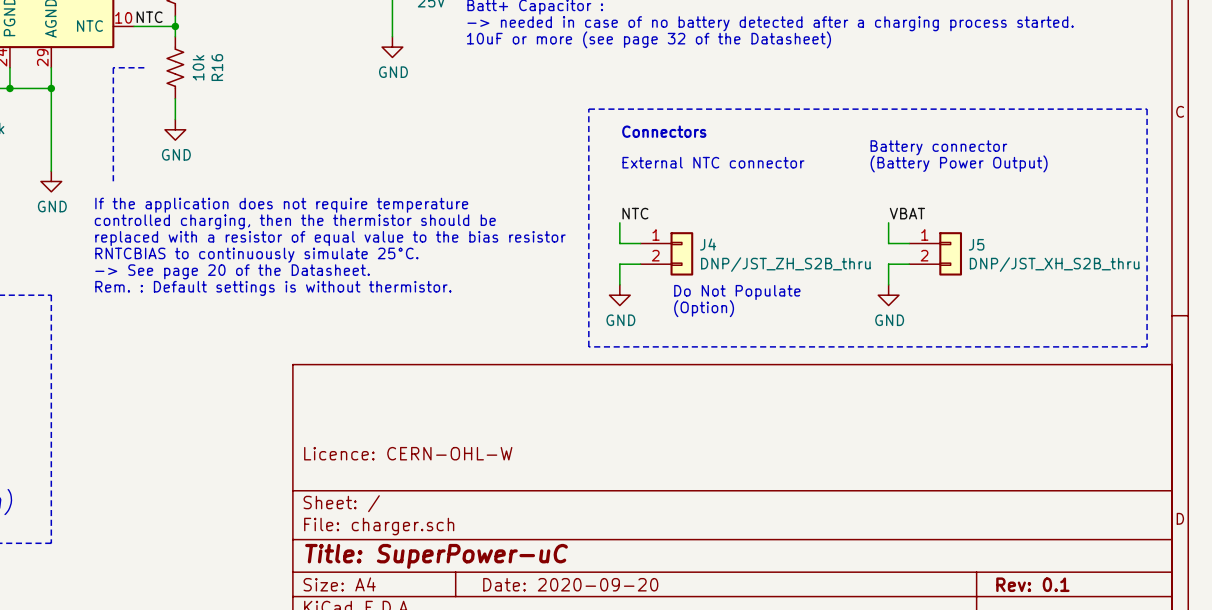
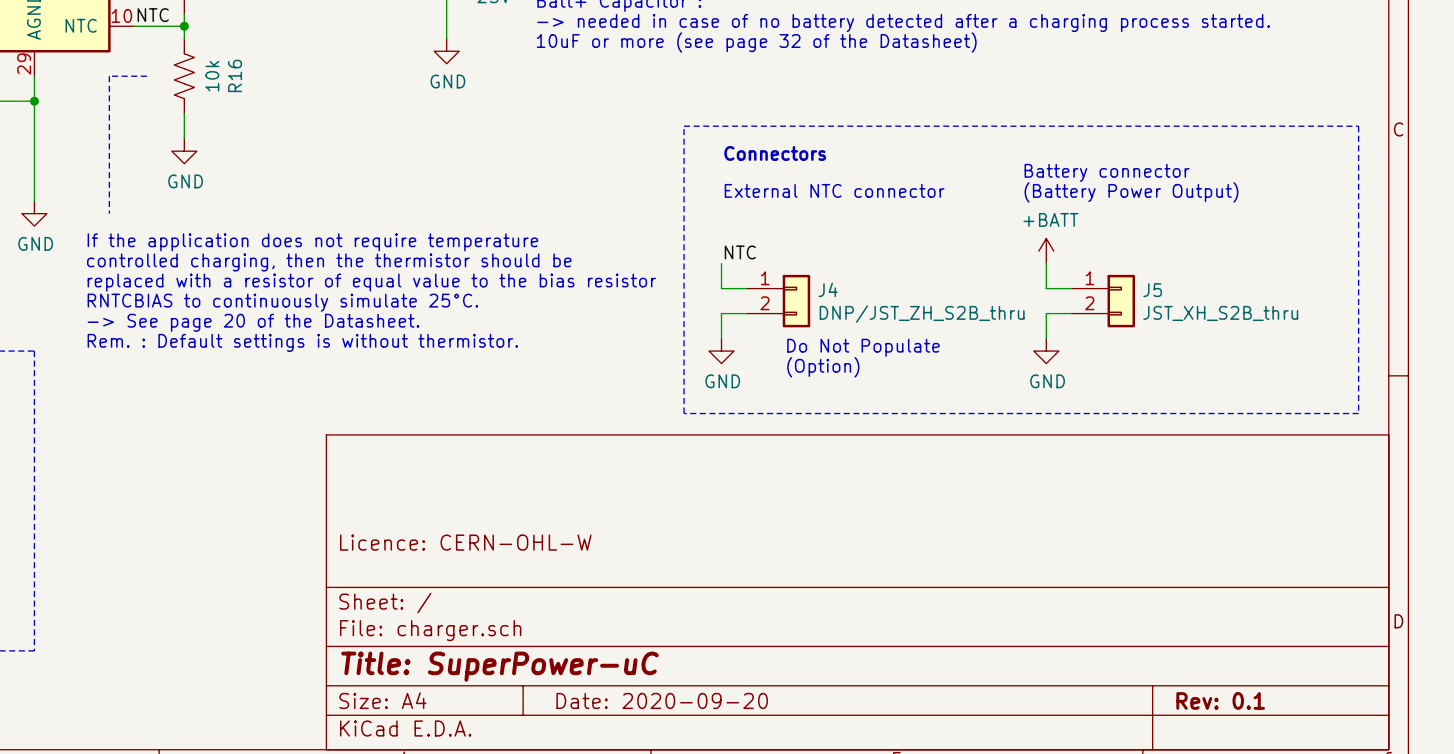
power symbol: none -> +BATT (1046, 251)
label: VBAT (907, 213) -> none
J5 value: DNP/JST_XH_S2B_thru (1054, 264) -> JST_XH_S2B_thru (1220, 313)

